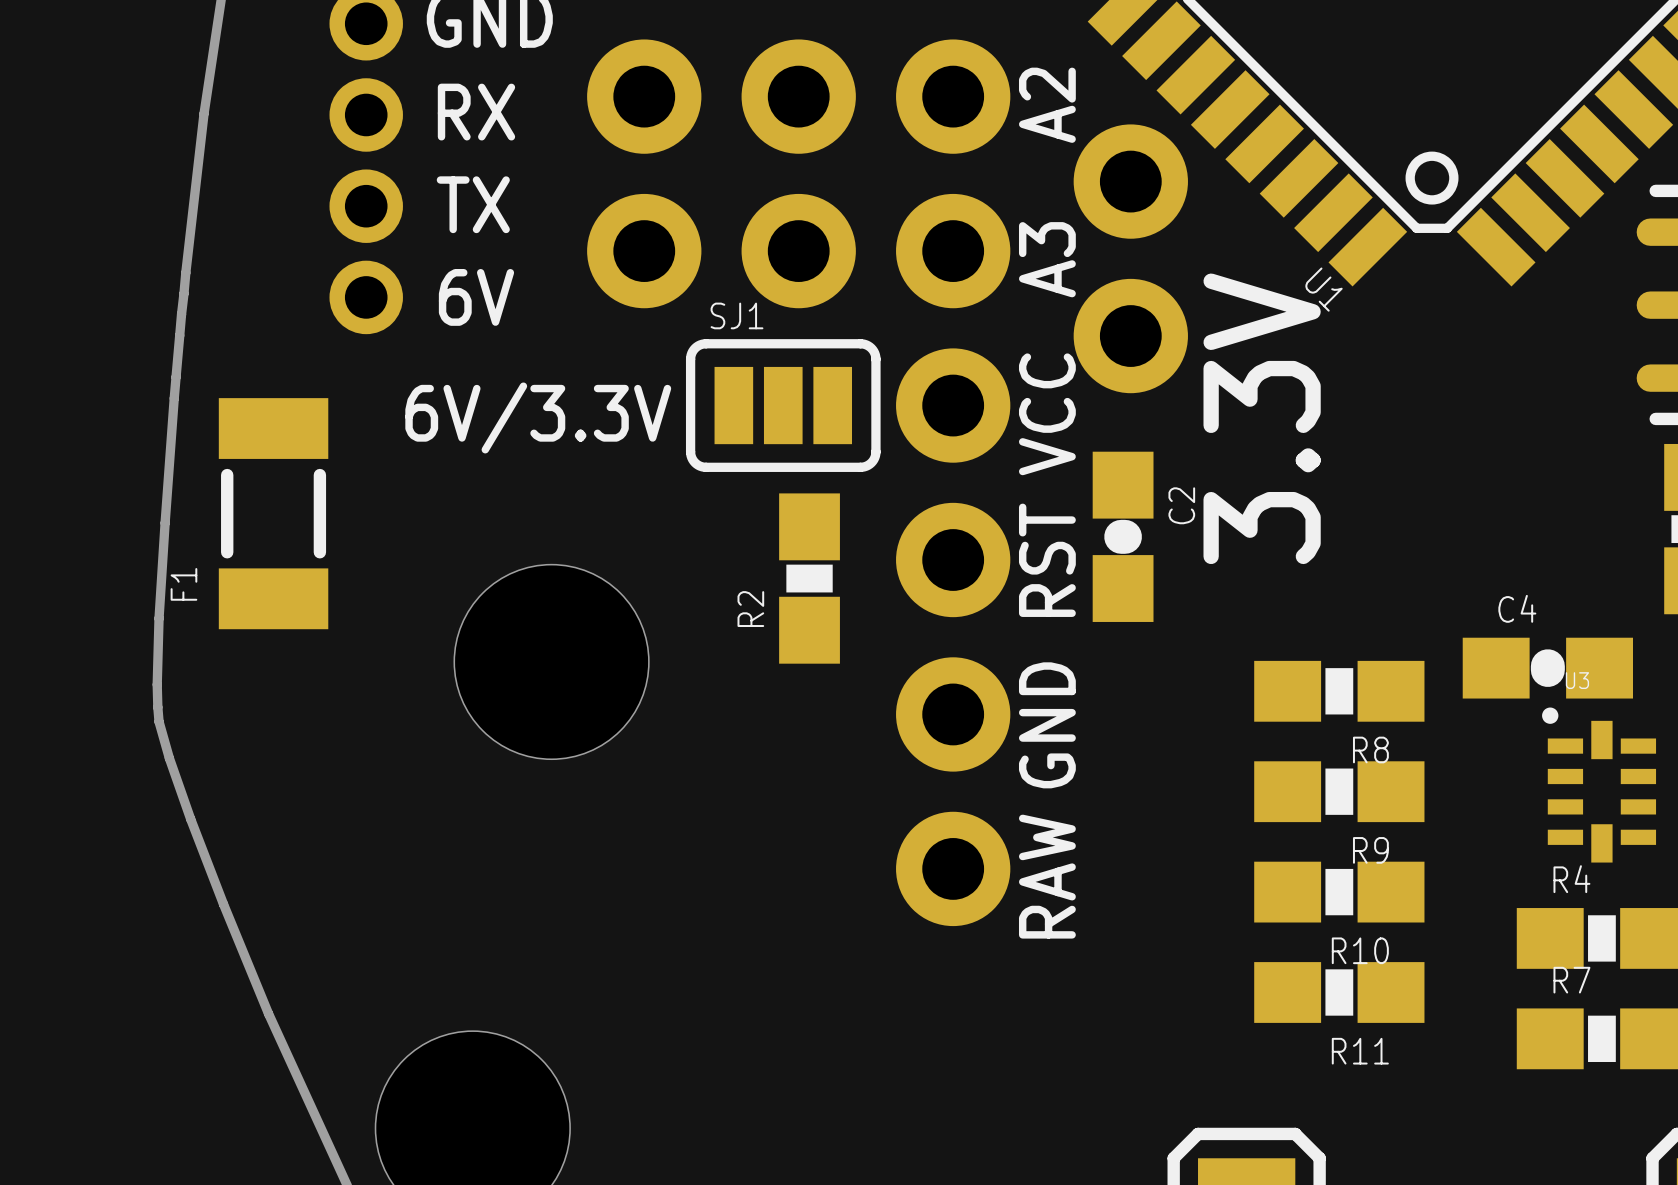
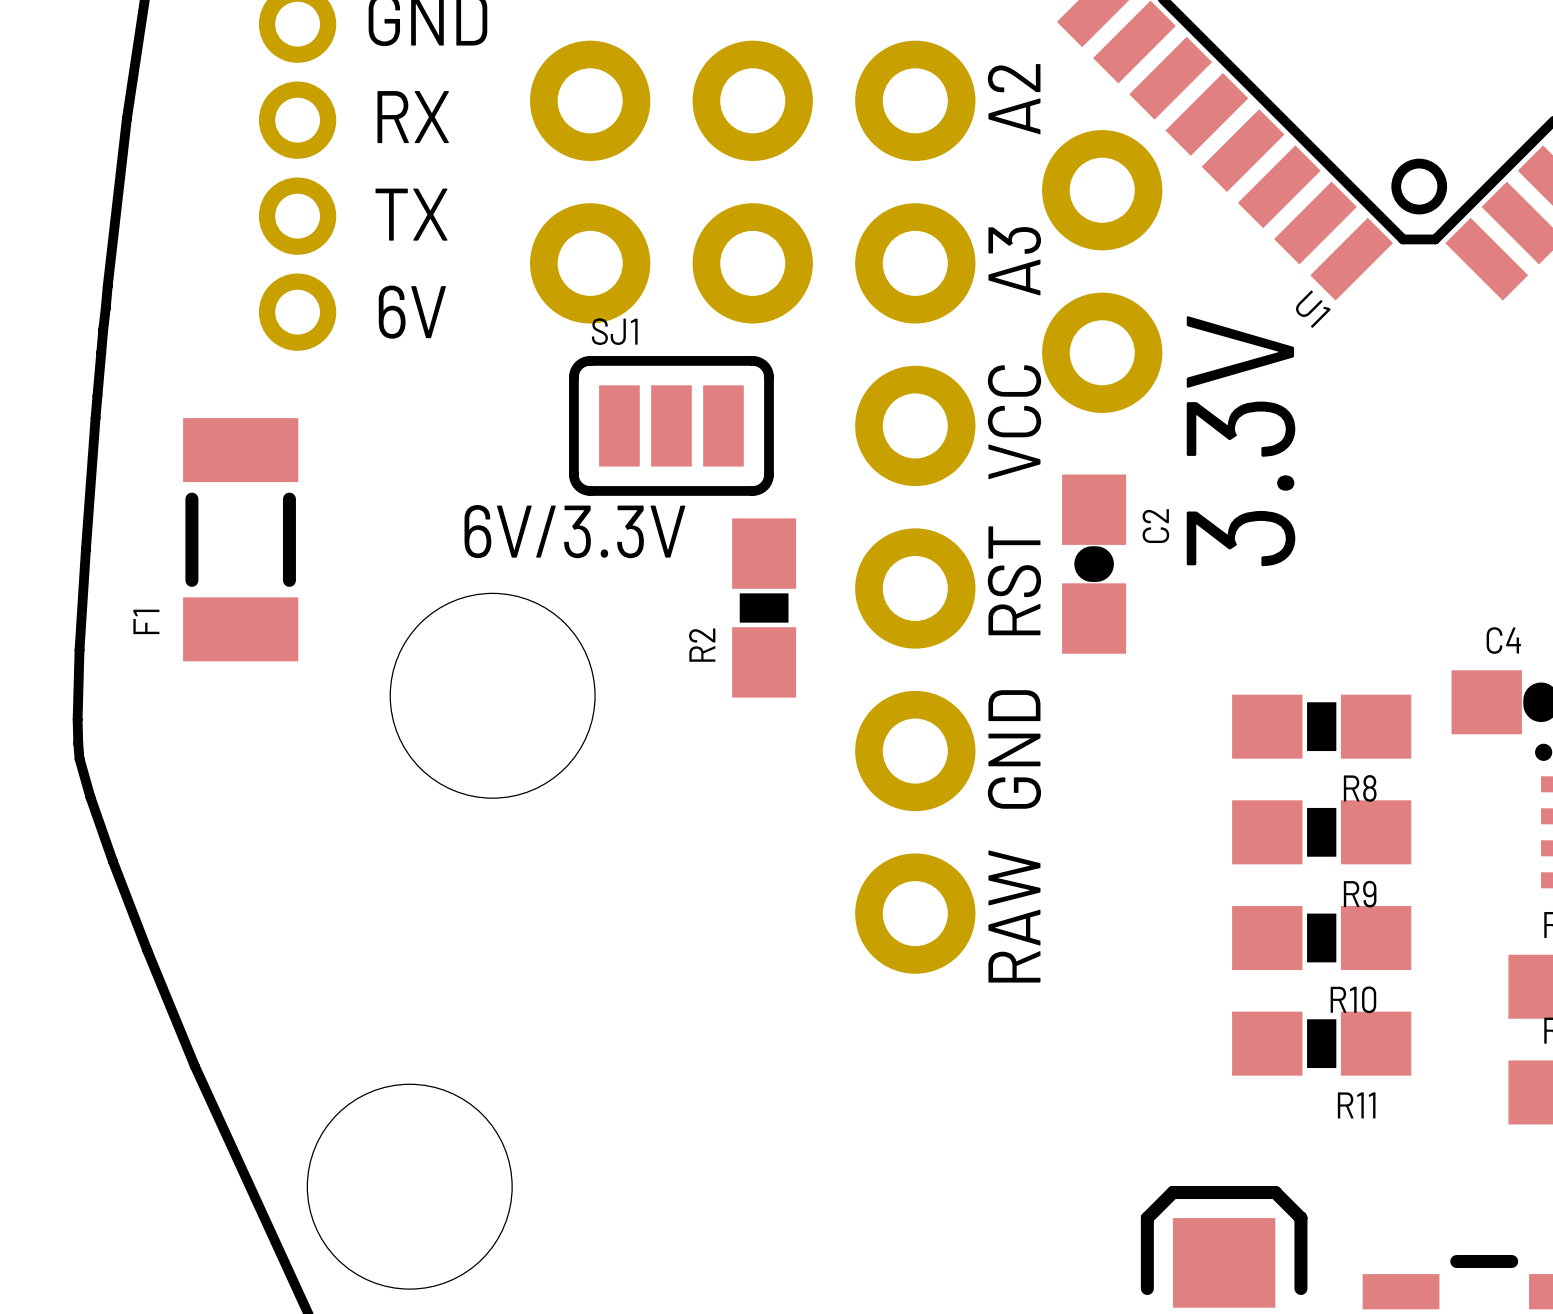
SJ1 position: (783, 405) -> (671, 425)
text position: 6V/3.3V (538, 417) -> 6V/3.3V (574, 531)
F1 position: (273, 513) -> (240, 539)

